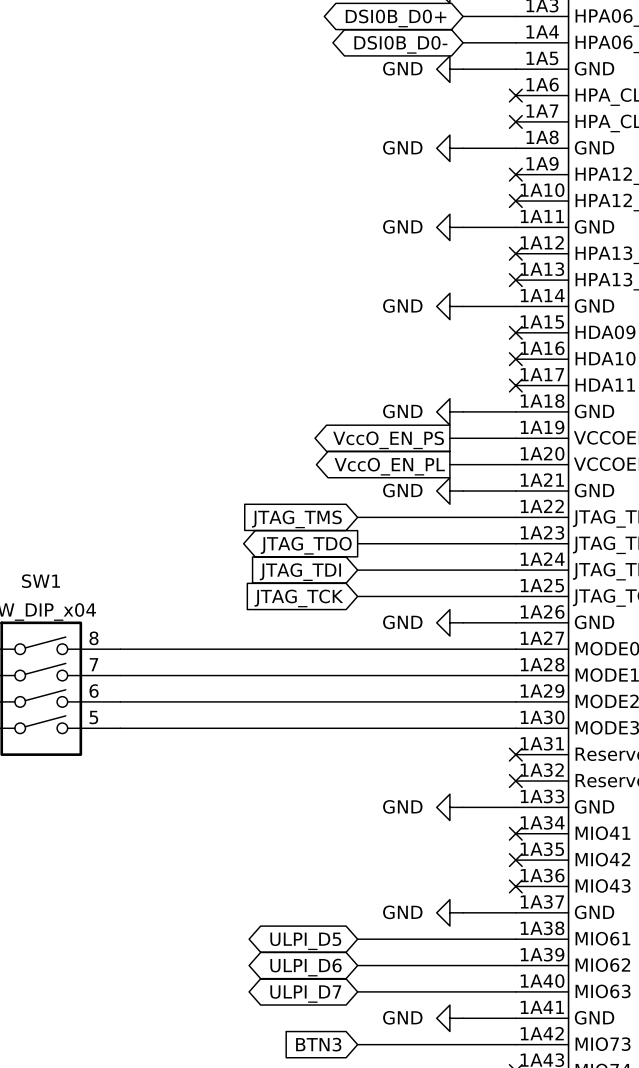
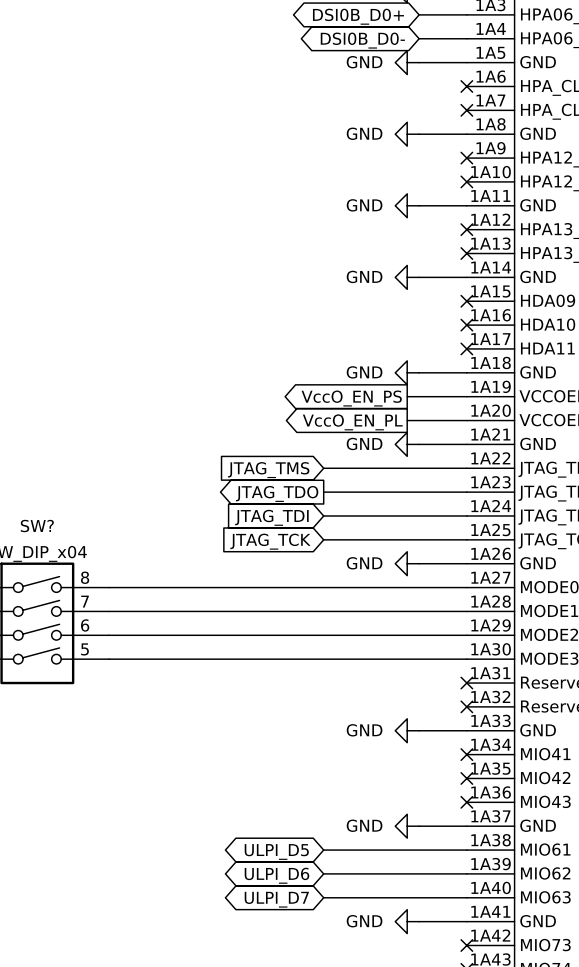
SW1 name: SW1 (41, 581) -> SW? (37, 526)
global label: BTN3 (318, 1044) -> none
wire: (357, 1044) (515, 1044) -> none
no-connect mark: none -> (466, 945)

